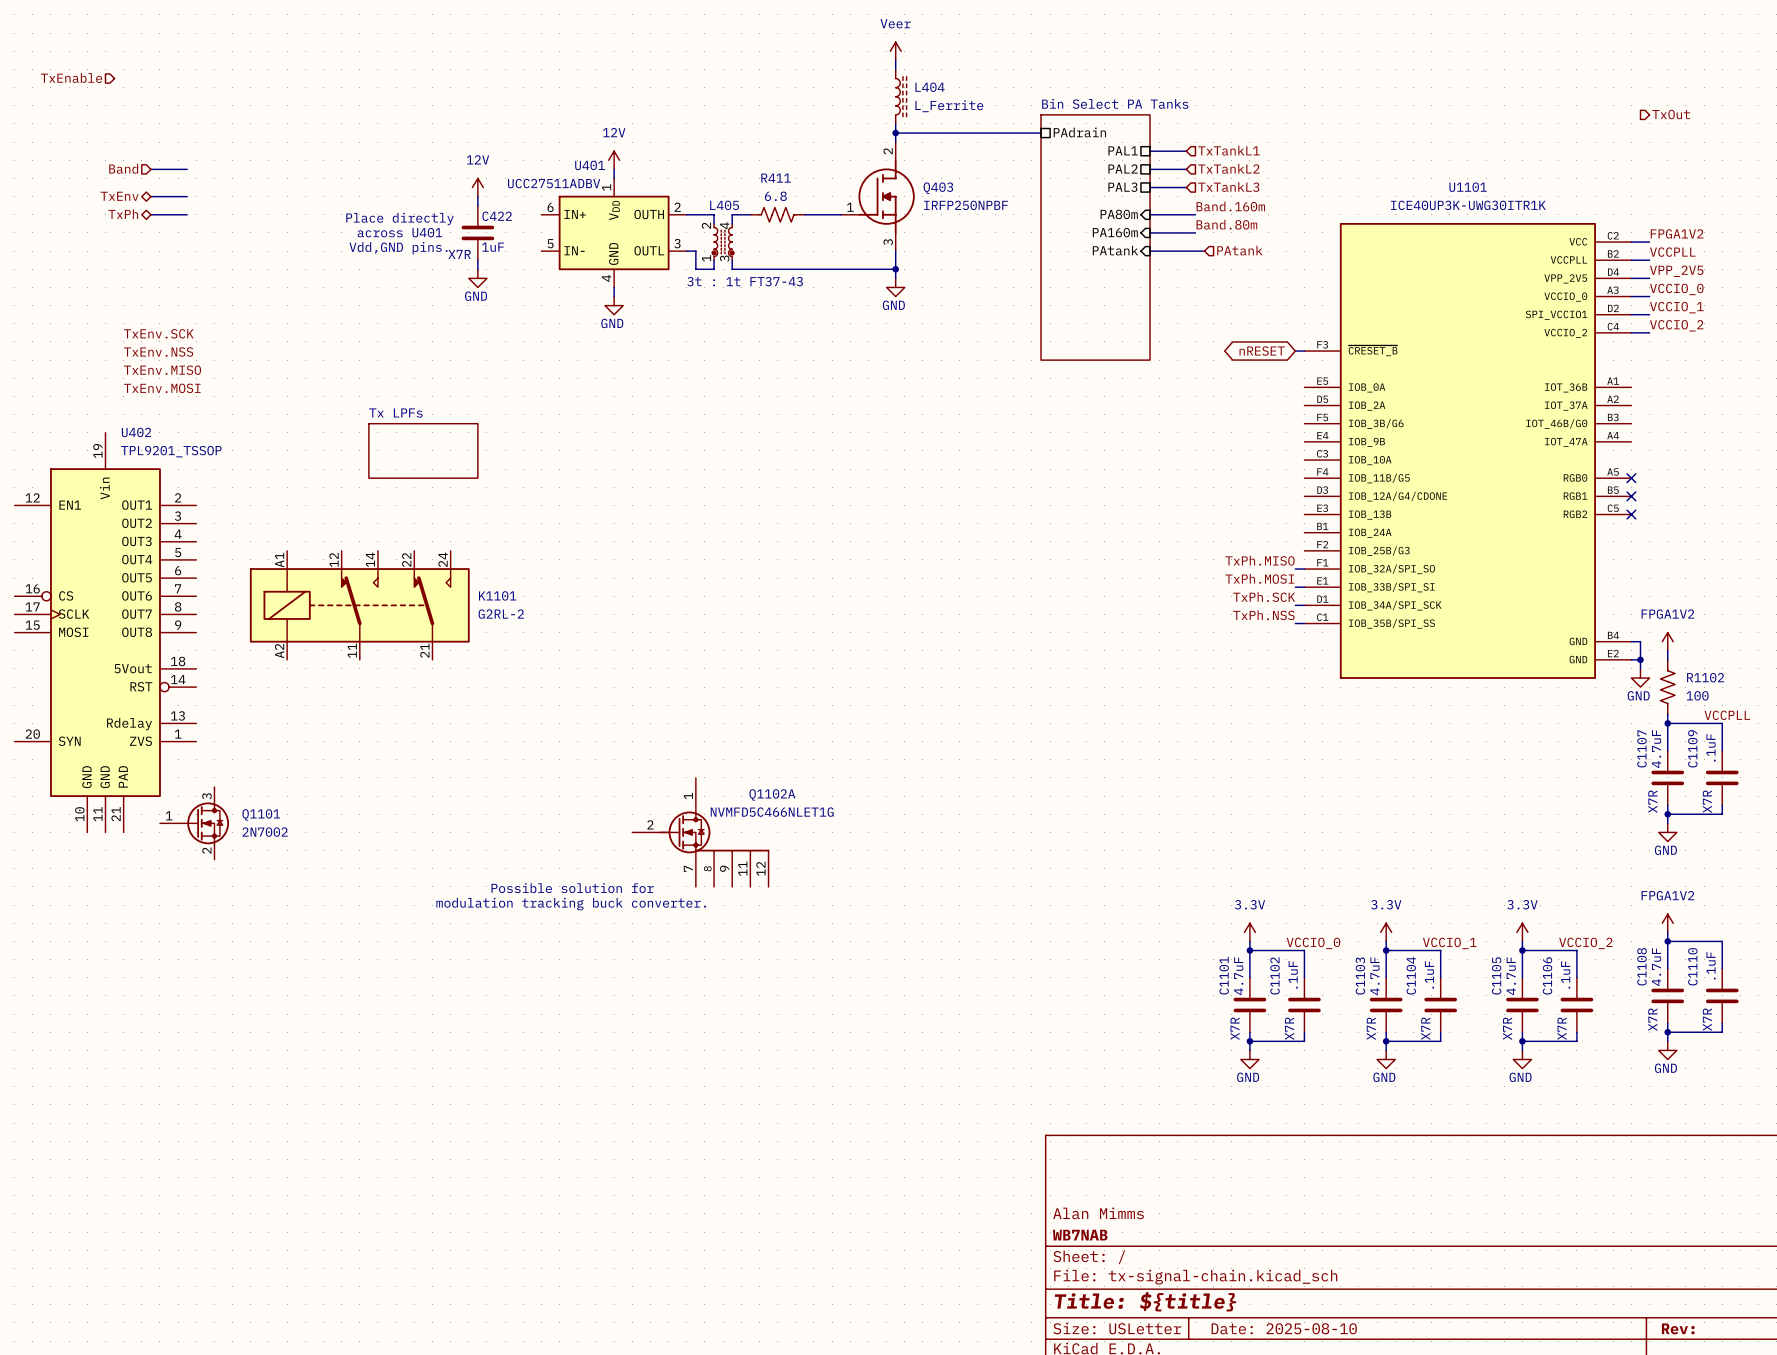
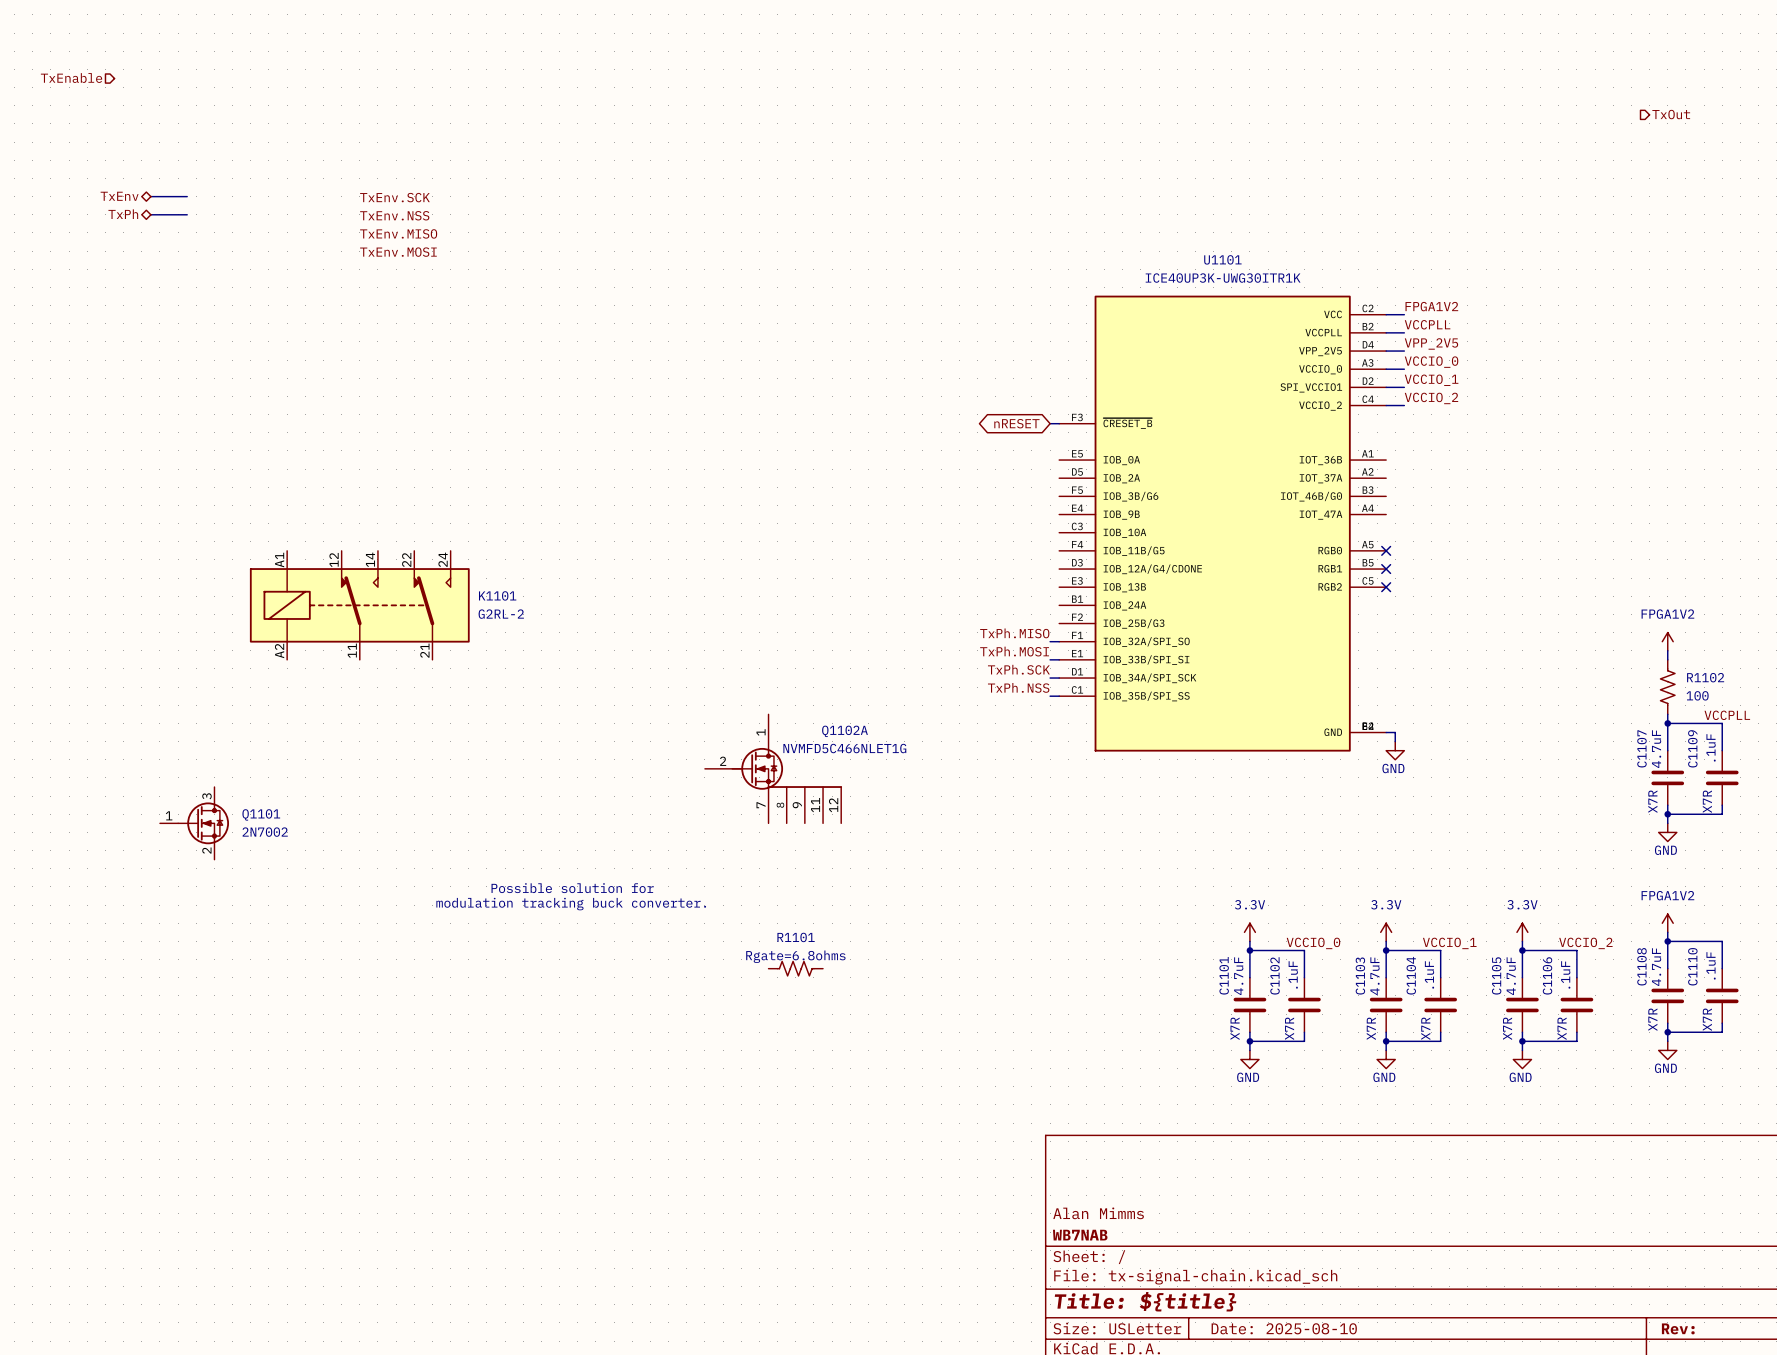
power symbol: Veer (895, 51) -> none
wire: (895, 60) (895, 69) -> none
L404: L_Ferrite (901, 96) -> none
wire: (895, 123) (895, 142) -> none
sheet pin: PAdrain (1079, 132) -> none
wire: (895, 133) (1041, 133) -> none
junction: (895, 133) -> none
sheet pin: PAL1 (1123, 150) -> none
hierarchical label: TxTankL1 (1228, 150) -> none
wire: (1150, 151) (1186, 151) -> none
power symbol: 12V (614, 160) -> none
hierarchical label: Band (123, 168) -> none
sheet pin: PAL2 (1123, 168) -> none
hierarchical label: TxTankL2 (1228, 168) -> none
bus: (150, 169) (187, 169) -> none
wire: (614, 169) (614, 178) -> none
wire: (1150, 169) (1186, 169) -> none
power symbol: 12V (477, 187) -> none
sheet pin: PAL3 (1122, 187) -> none
wire: (1150, 187) (1186, 187) -> none
hierarchical label: TxTankL3 (1228, 187) -> none
wire: (477, 196) (477, 205) -> none
Q403: IRFP250NPBF (877, 196) -> none
label: none -> TxEnv.SCK (394, 197)
label: Band.160m (1230, 206) -> none
wire: (686, 214) (714, 214) (714, 223) -> none
wire: (750, 214) (732, 214) (732, 223) -> none
R411: 6.8 (777, 214) -> none
wire: (804, 214) (841, 214) -> none
sheet pin: PA80m (1119, 214) -> none
wire: (1150, 214) (1195, 214) -> none
label: none -> TxEnv.NSS (394, 215)
text: Place directly (400, 219) -> none
U1101 symbol: [1304, 222, 1632, 679] -> [1059, 295, 1387, 752]
label: Band.80m (1226, 224) -> none
text: across U401 (399, 232) -> none
C422: 1uF (477, 232) -> none
U401: UCC27511ADBV (614, 232) -> none
sheet pin: PA160m (1115, 232) -> none
wire: (1150, 232) (1195, 232) -> none
label: none -> TxEnv.MISO (398, 233)
label: FPGA1V2 (1677, 233) -> none
sheet Bin Select PA Tanks: (1095, 237) -> none
L405: 3t : 1t FT37-43 (723, 242) -> none
wire: (1631, 242) (1649, 242) -> none
text: Vdd,GND pins. (398, 248) -> none
sheet pin: PAtank (1115, 250) -> none
hierarchical label: PAtank (1239, 250) -> none
wire: (686, 251) (695, 251) (695, 269) (714, 269) (714, 260) -> none
wire: (895, 251) (895, 278) -> none
wire: (1150, 251) (1204, 251) -> none
label: none -> TxEnv.MOSI (398, 252)
label: VCCPLL (1672, 252) -> none
wire: (477, 260) (477, 269) -> none
wire: (732, 260) (732, 269) (895, 269) -> none
wire: (1631, 260) (1649, 260) -> none
junction: (895, 269) -> none
label: VPP_2V5 (1676, 271) -> none
power symbol: GND (477, 278) -> none
wire: (1631, 278) (1649, 278) -> none
wire: (614, 287) (614, 296) -> none
power symbol: GND (895, 287) -> none
label: VCCIO_0 (1676, 289) -> none
wire: (1631, 296) (1649, 296) -> none
power symbol: GND (614, 305) -> none
label: none -> FPGA1V2 (1431, 306)
label: VCCIO_1 (1676, 307) -> none
wire: (1631, 314) (1649, 314) -> none
label: none -> VCCPLL (1427, 324)
label: VCCIO_2 (1676, 325) -> none
wire: (1631, 332) (1649, 332) -> none
label: TxEnv.SCK (158, 333) -> none
label: none -> VPP_2V5 (1431, 343)
global label: nRESET (1262, 351) -> none
label: TxEnv.NSS (158, 352) -> none
label: none -> VCCIO_0 (1431, 362)
label: TxEnv.MISO (162, 370) -> none
label: none -> VCCIO_1 (1431, 380)
label: TxEnv.MOSI (162, 388) -> none
label: none -> VCCIO_2 (1431, 398)
global label: none -> nRESET (1016, 423)
wire: none -> (1050, 423) (1059, 423)
sheet Tx LPFs: (423, 450) -> none
no-connect mark: (1631, 478) -> none
no-connect mark: (1631, 496) -> none
no-connect mark: (1631, 514) -> none
no-connect mark: none -> (1386, 550)
label: TxPh.MISO (1260, 560) -> none
no-connect mark: none -> (1386, 569)
label: TxPh.MOSI (1259, 578) -> none
no-connect mark: none -> (1386, 587)
label: TxPh.SCK (1264, 597) -> none
label: TxPh.NSS (1263, 615) -> none
U402: TPL9201_TSSOP (105, 632) -> none
label: none -> TxPh.MISO (1014, 633)
wire: none -> (1050, 641) (1059, 641)
wire: (1631, 641) (1640, 641) (1640, 668) -> none
label: none -> TxPh.MOSI (1014, 651)
wire: none -> (1050, 659) (1059, 659)
wire: (1631, 659) (1640, 659) -> none
junction: (1640, 659) -> none
label: none -> TxPh.SCK (1018, 669)
wire: none -> (1050, 678) (1059, 678)
power symbol: GND (1640, 678) -> none
label: none -> TxPh.NSS (1018, 687)
wire: none -> (1050, 696) (1059, 696)
wire: none -> (1386, 732) (1395, 732) (1395, 741)
power symbol: none -> GND (1395, 750)
Q1102A position: (700, 832) -> (773, 768)
R1101: none -> Rgate=6.8ohms (795, 968)

